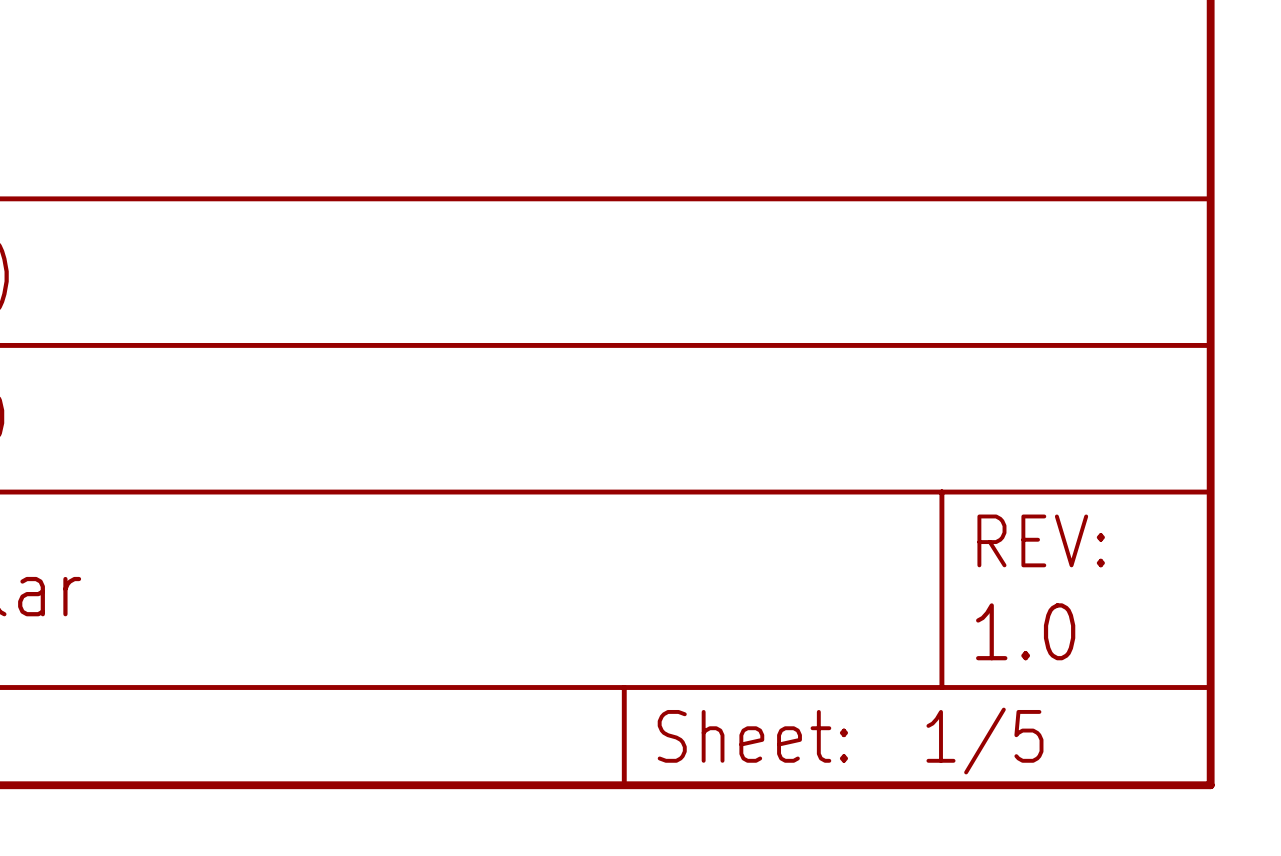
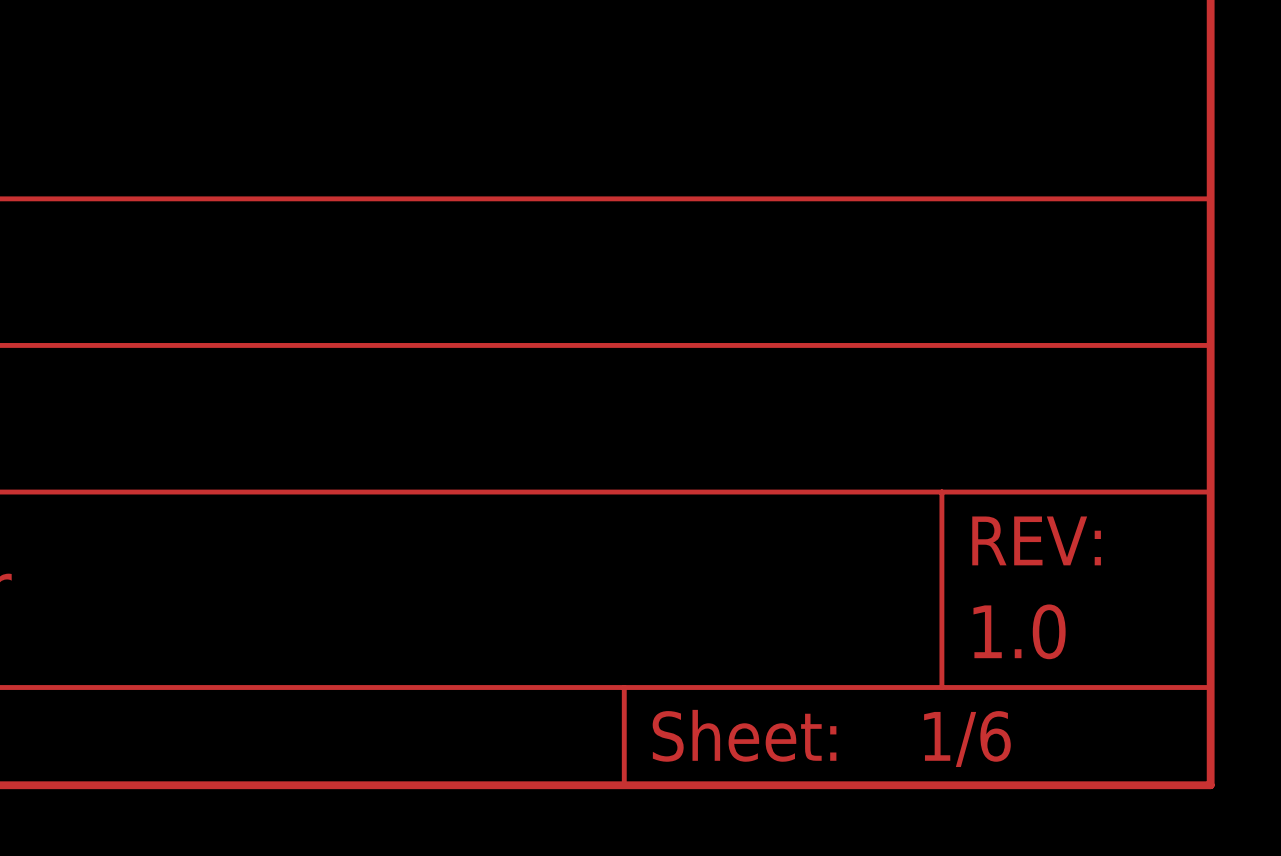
part text: 1/5 (984, 741) -> 1/6 (967, 739)

